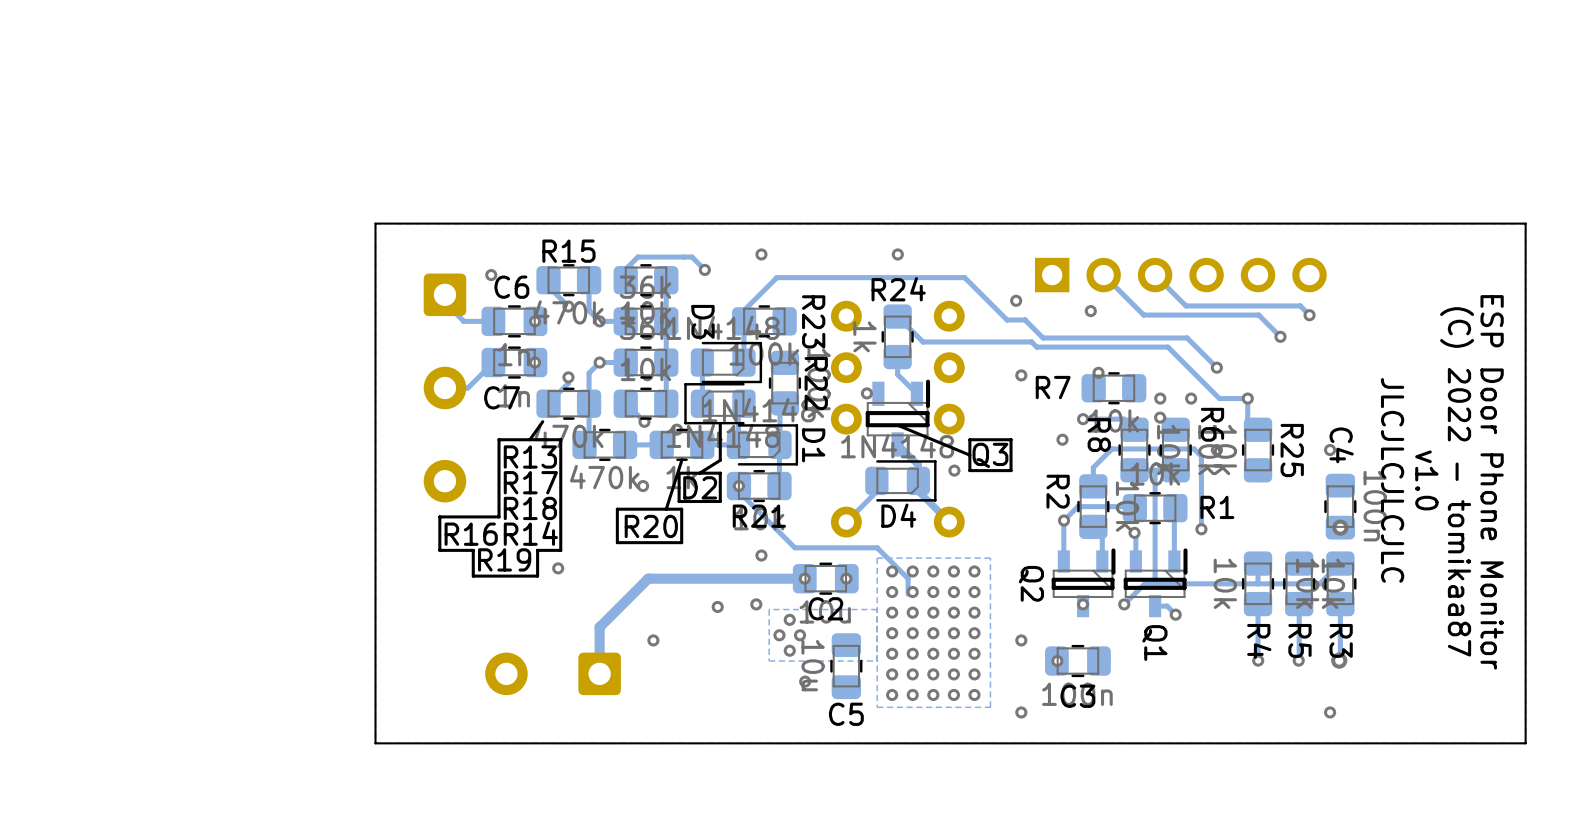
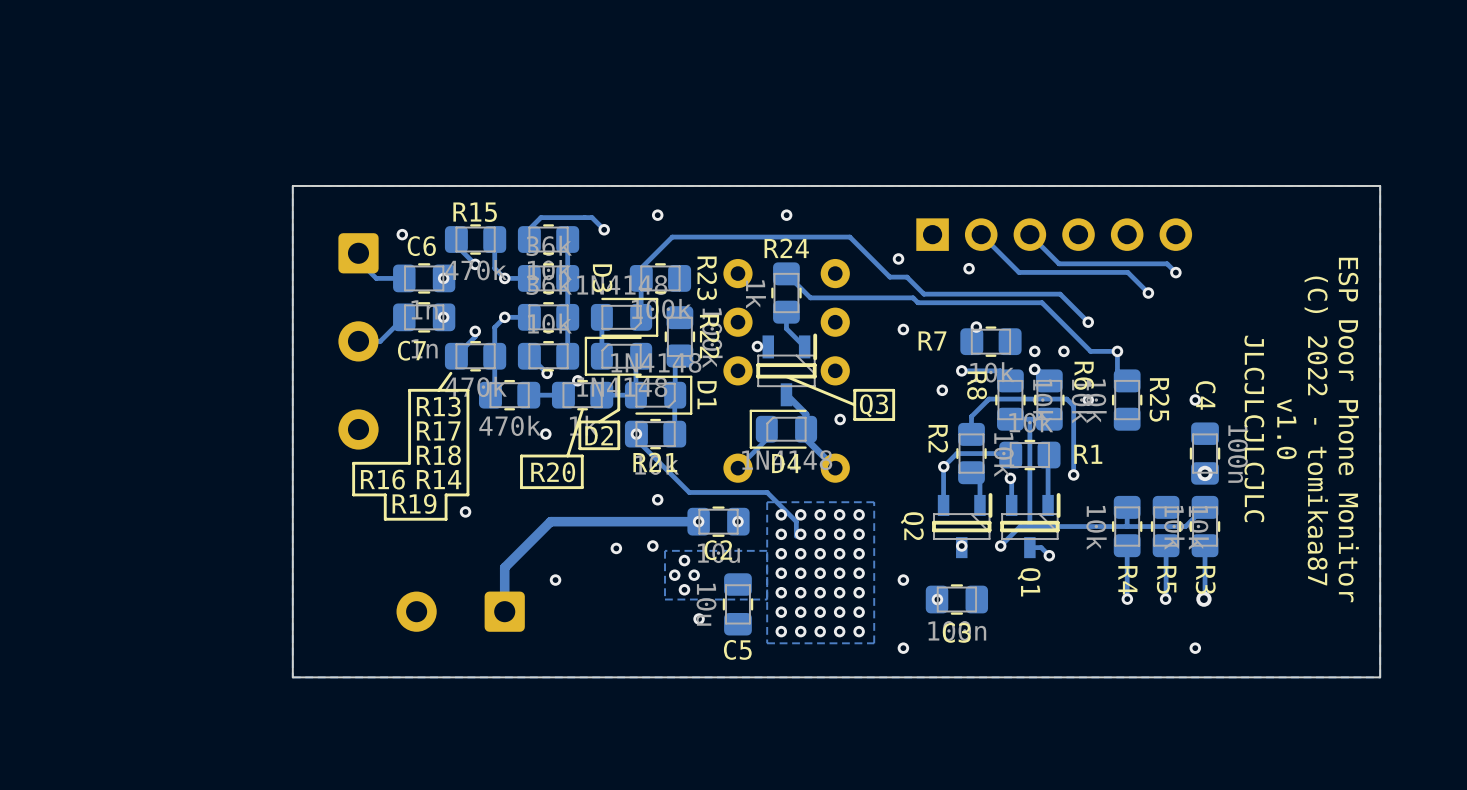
D4 rotation: 0° (900, 480) -> 180° (783, 429)

